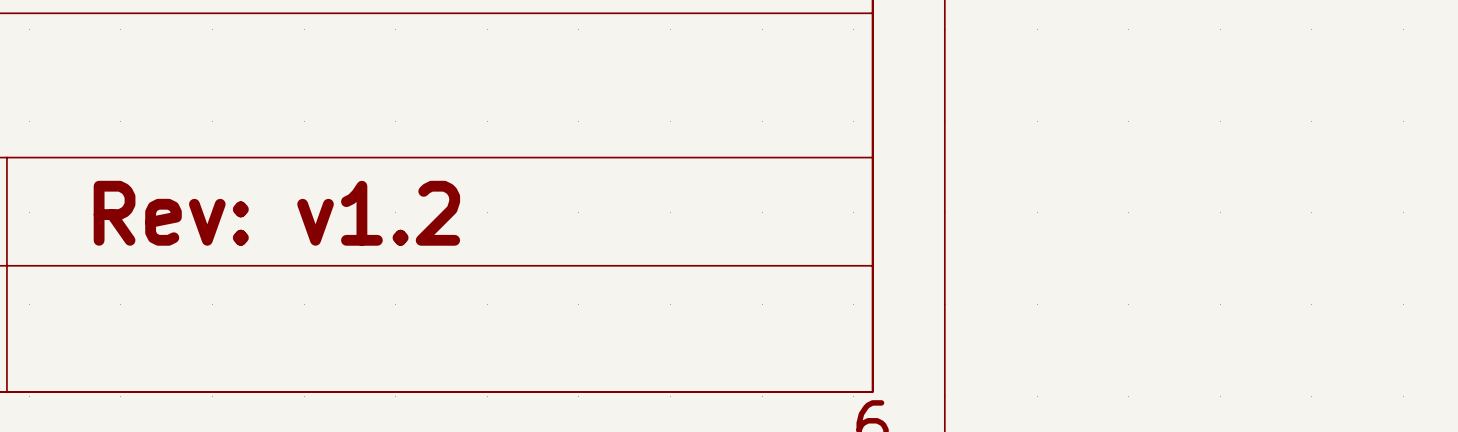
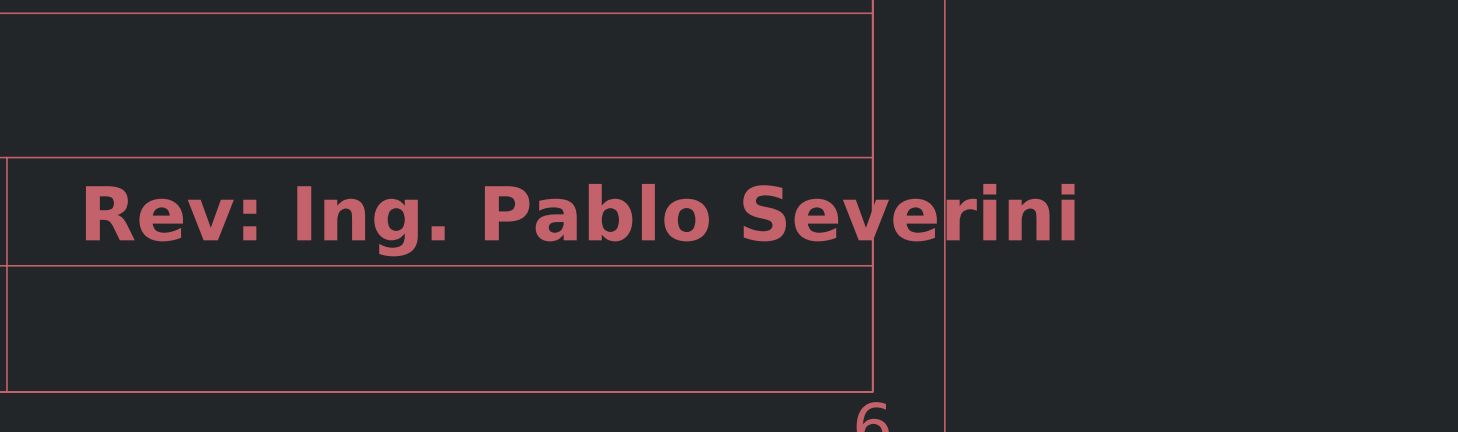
title block: Rev: v1.2 (276, 213) -> Rev: Ing. Pablo Severini (580, 220)

